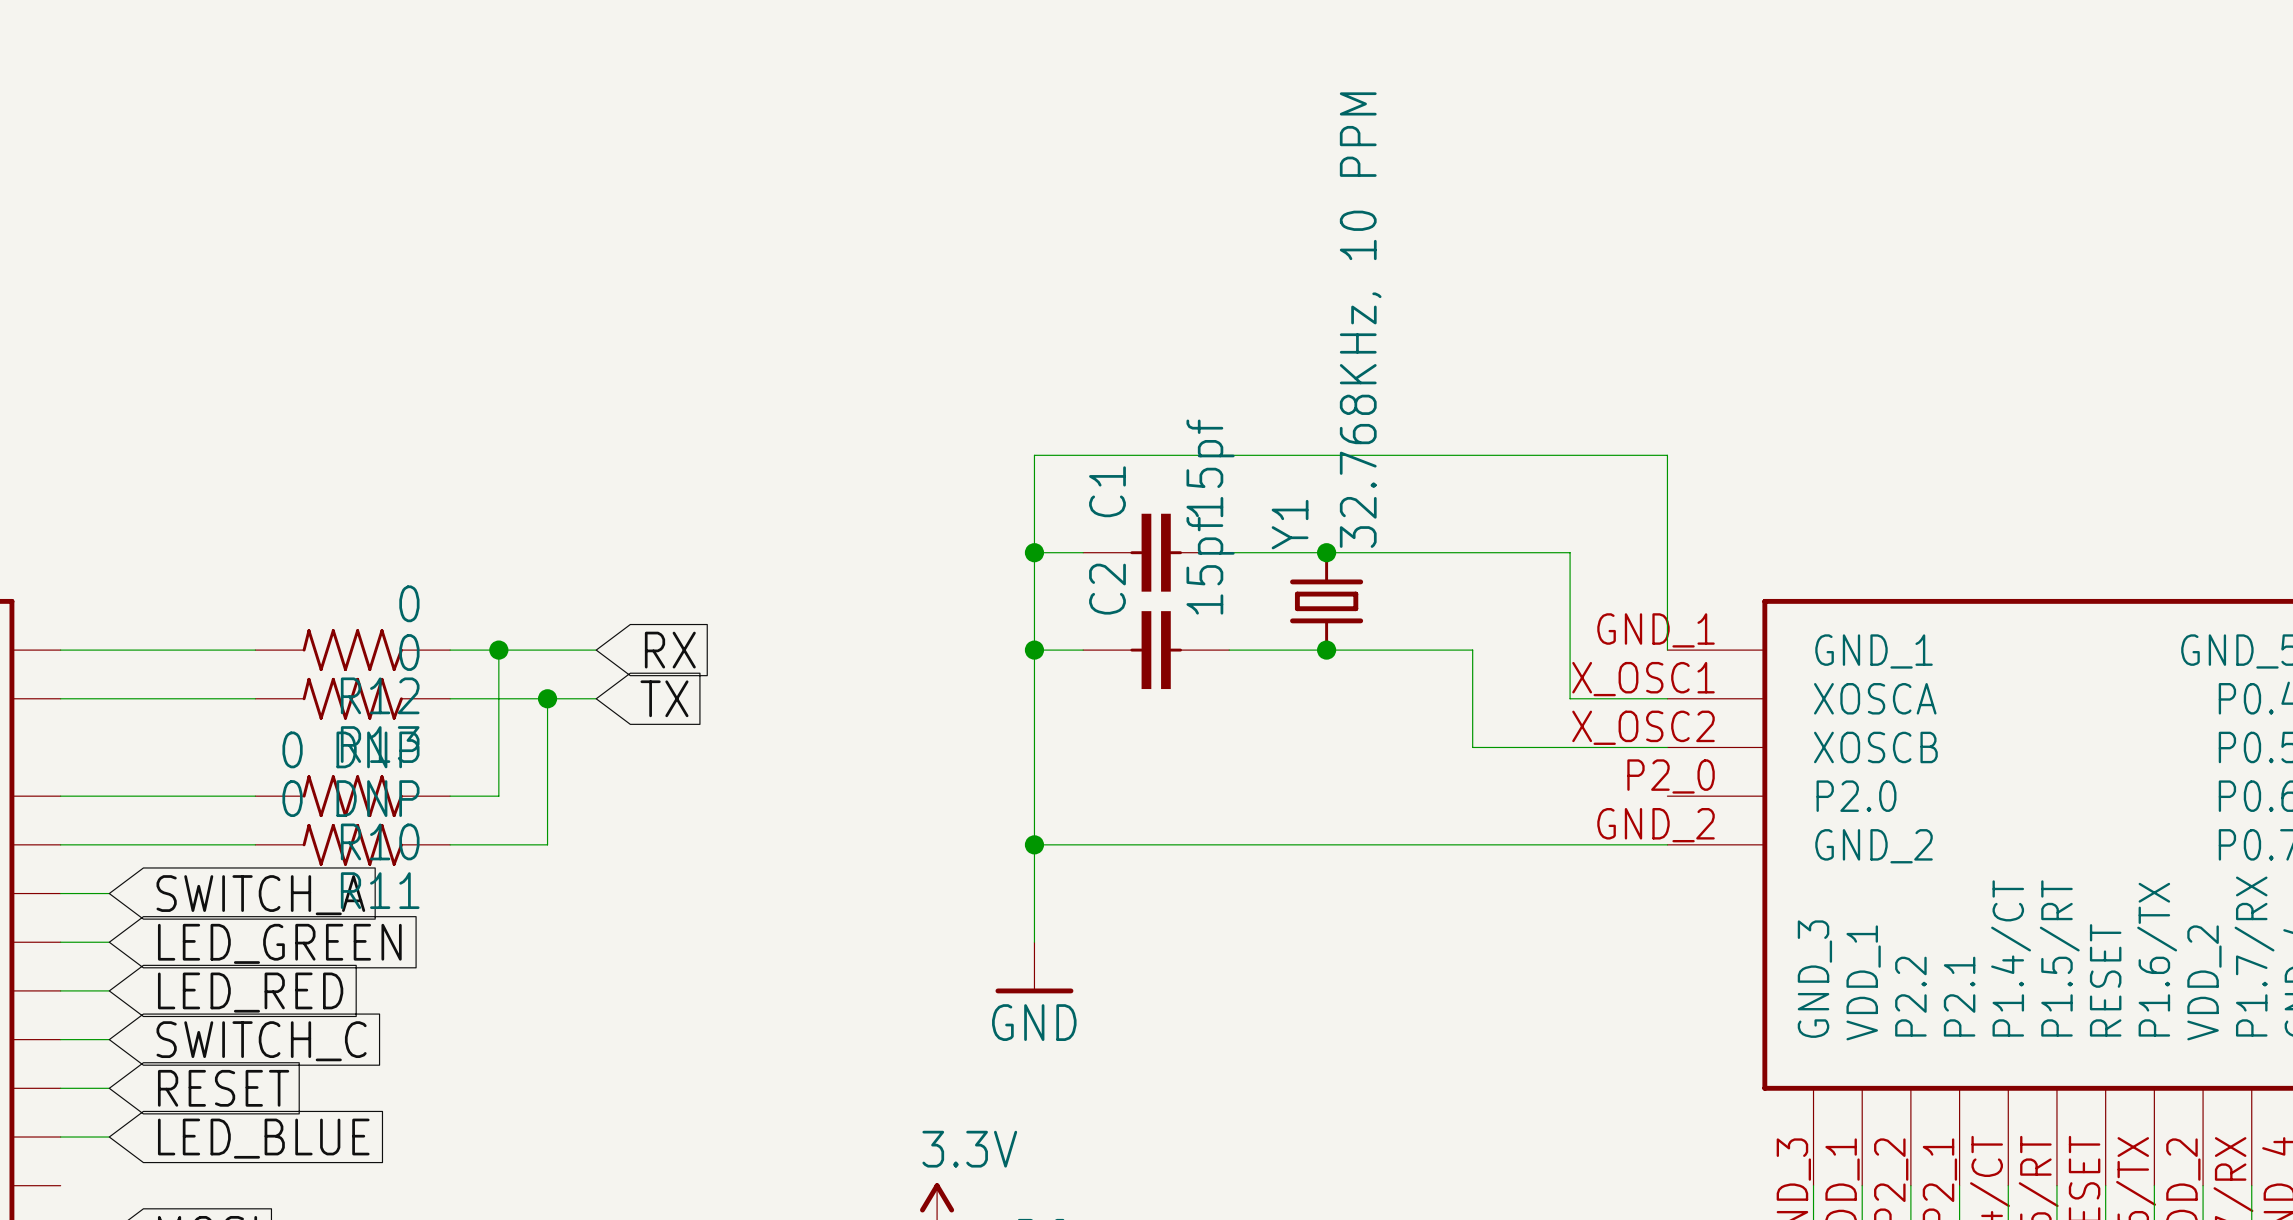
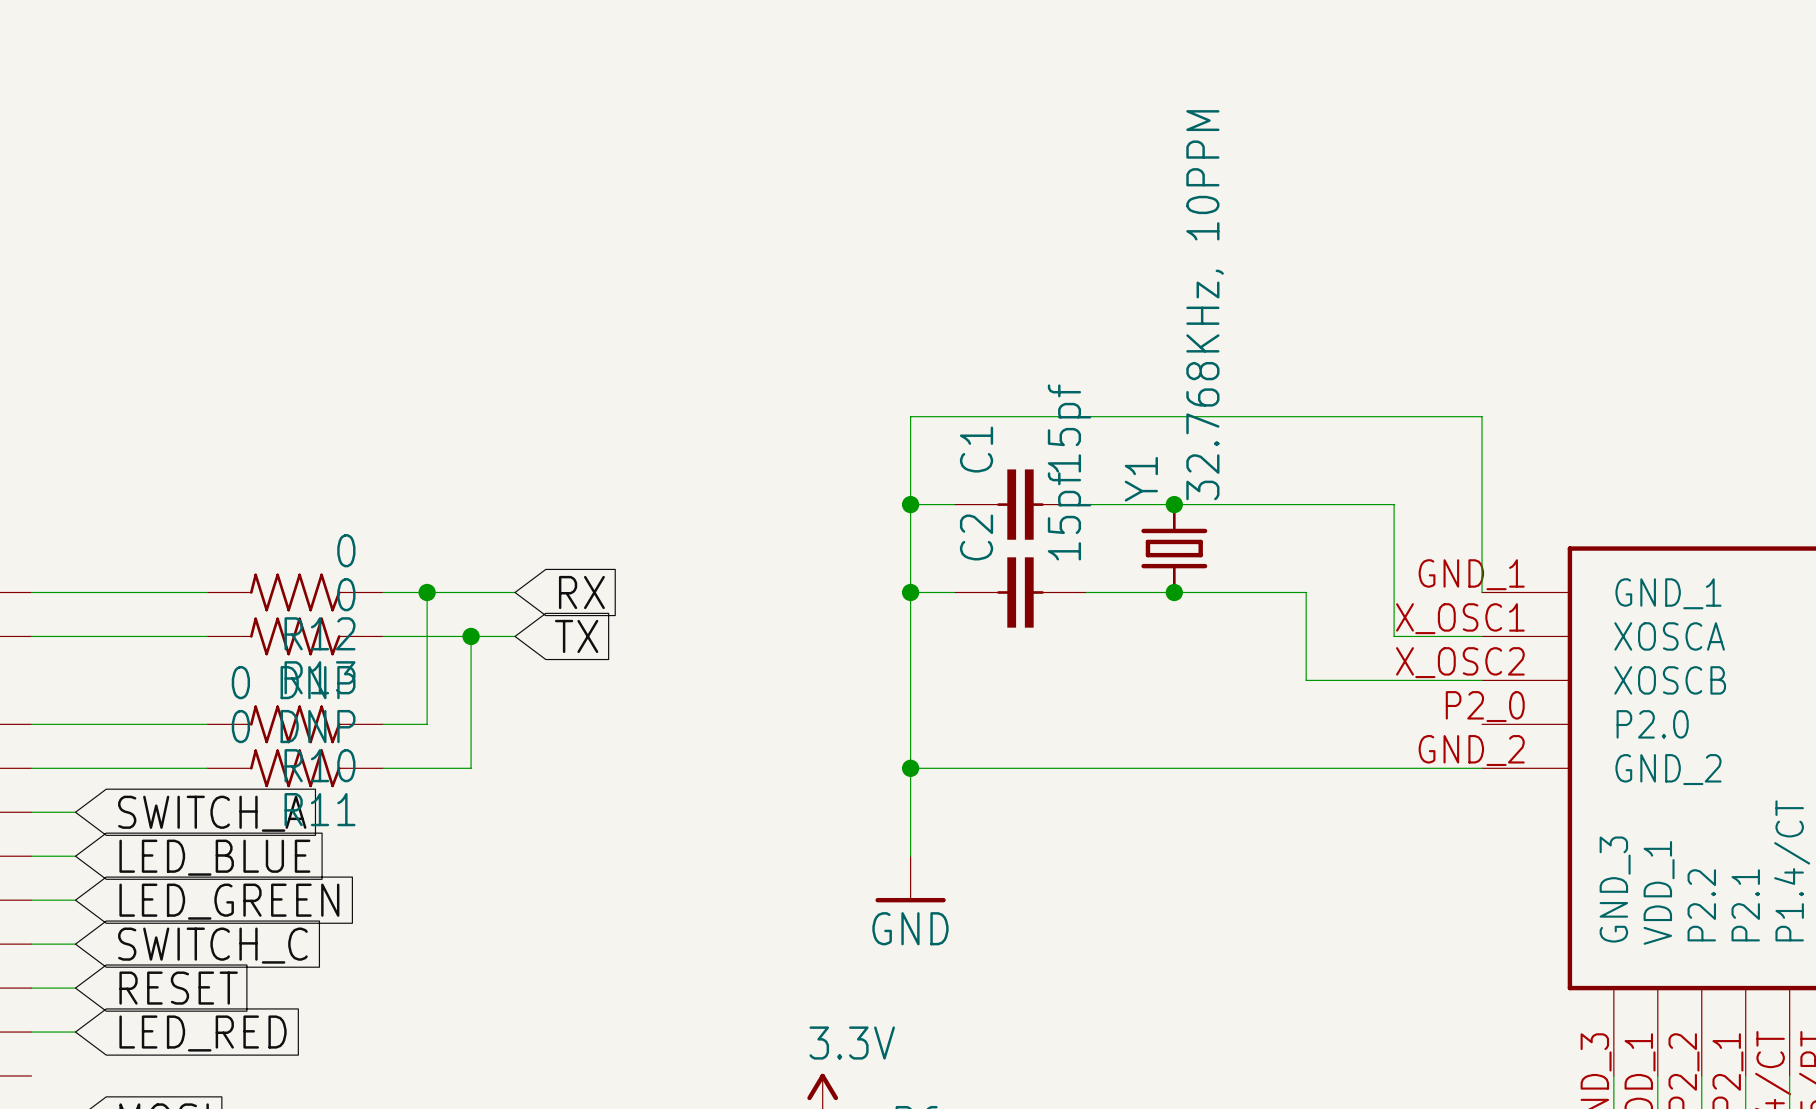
Y1 value: 32.768KHz, 10 PPM (1360, 320) -> 32.768KHz, 10PPM (1205, 305)
global label: LED_GREEN (279, 943) -> LED_BLUE (214, 857)
global label: LED_RED (250, 992) -> LED_GREEN (229, 901)
global label: LED_BLUE (263, 1138) -> LED_RED (203, 1033)

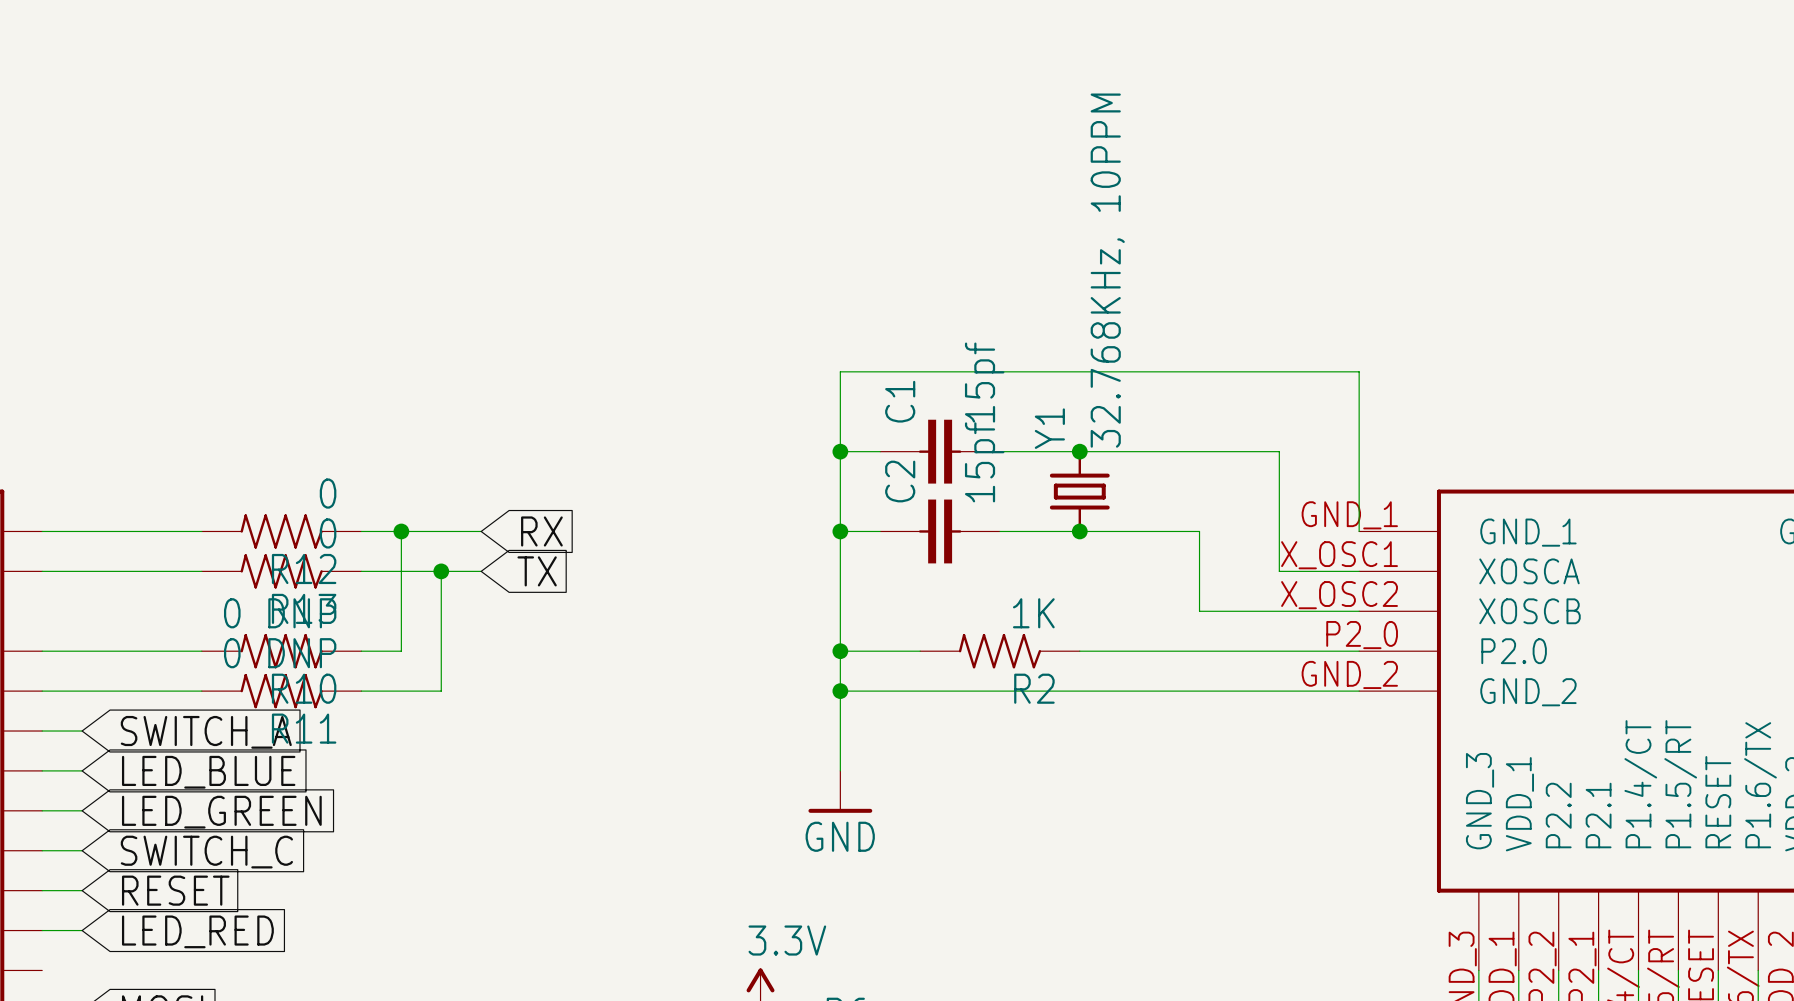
wire: none -> (840, 651) (920, 651)
junction: none -> (840, 651)
R2: none -> 1K (999, 651)
wire: none -> (1079, 651) (1359, 651)

